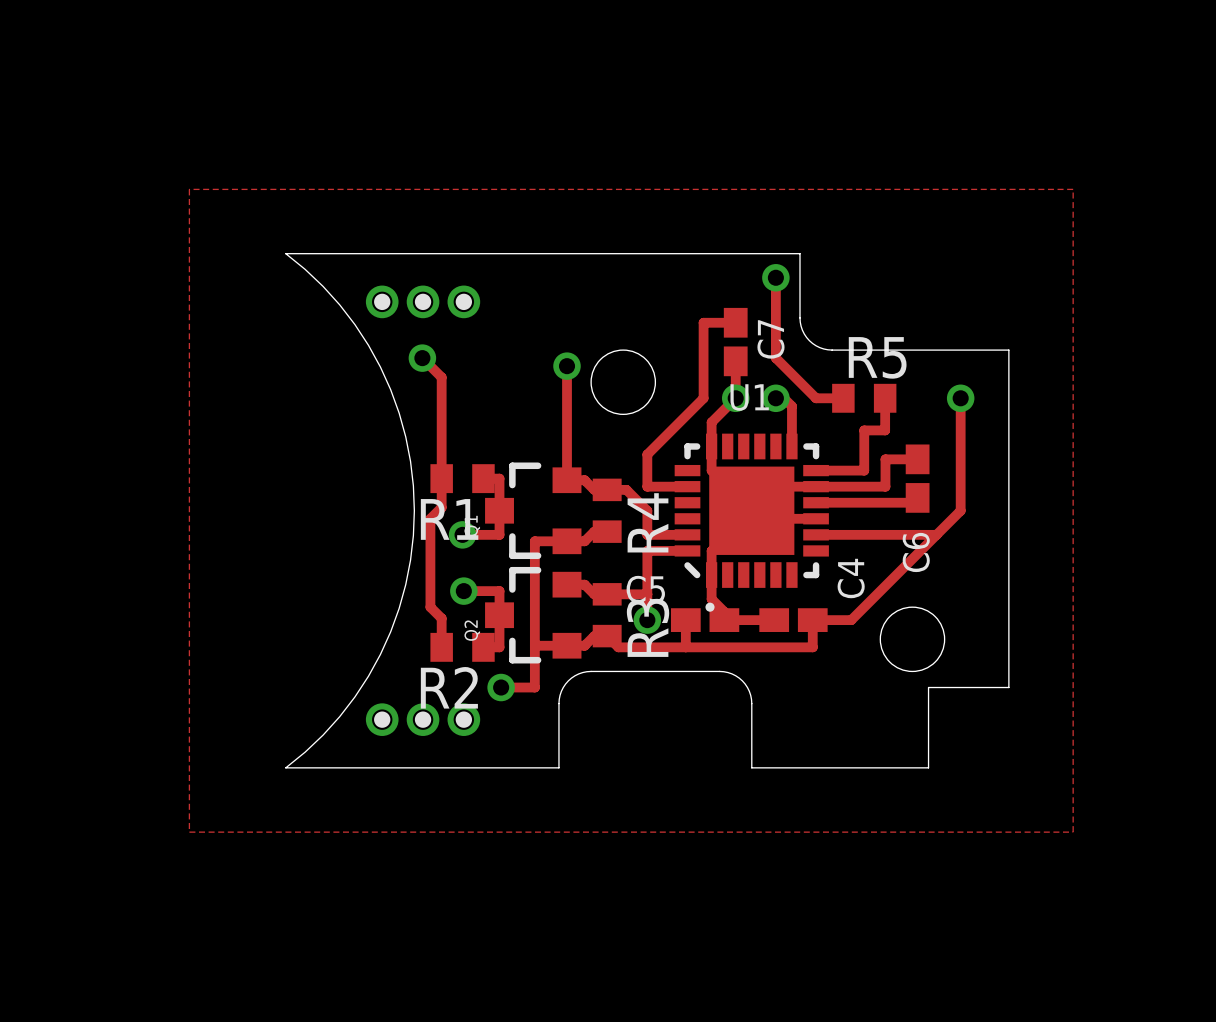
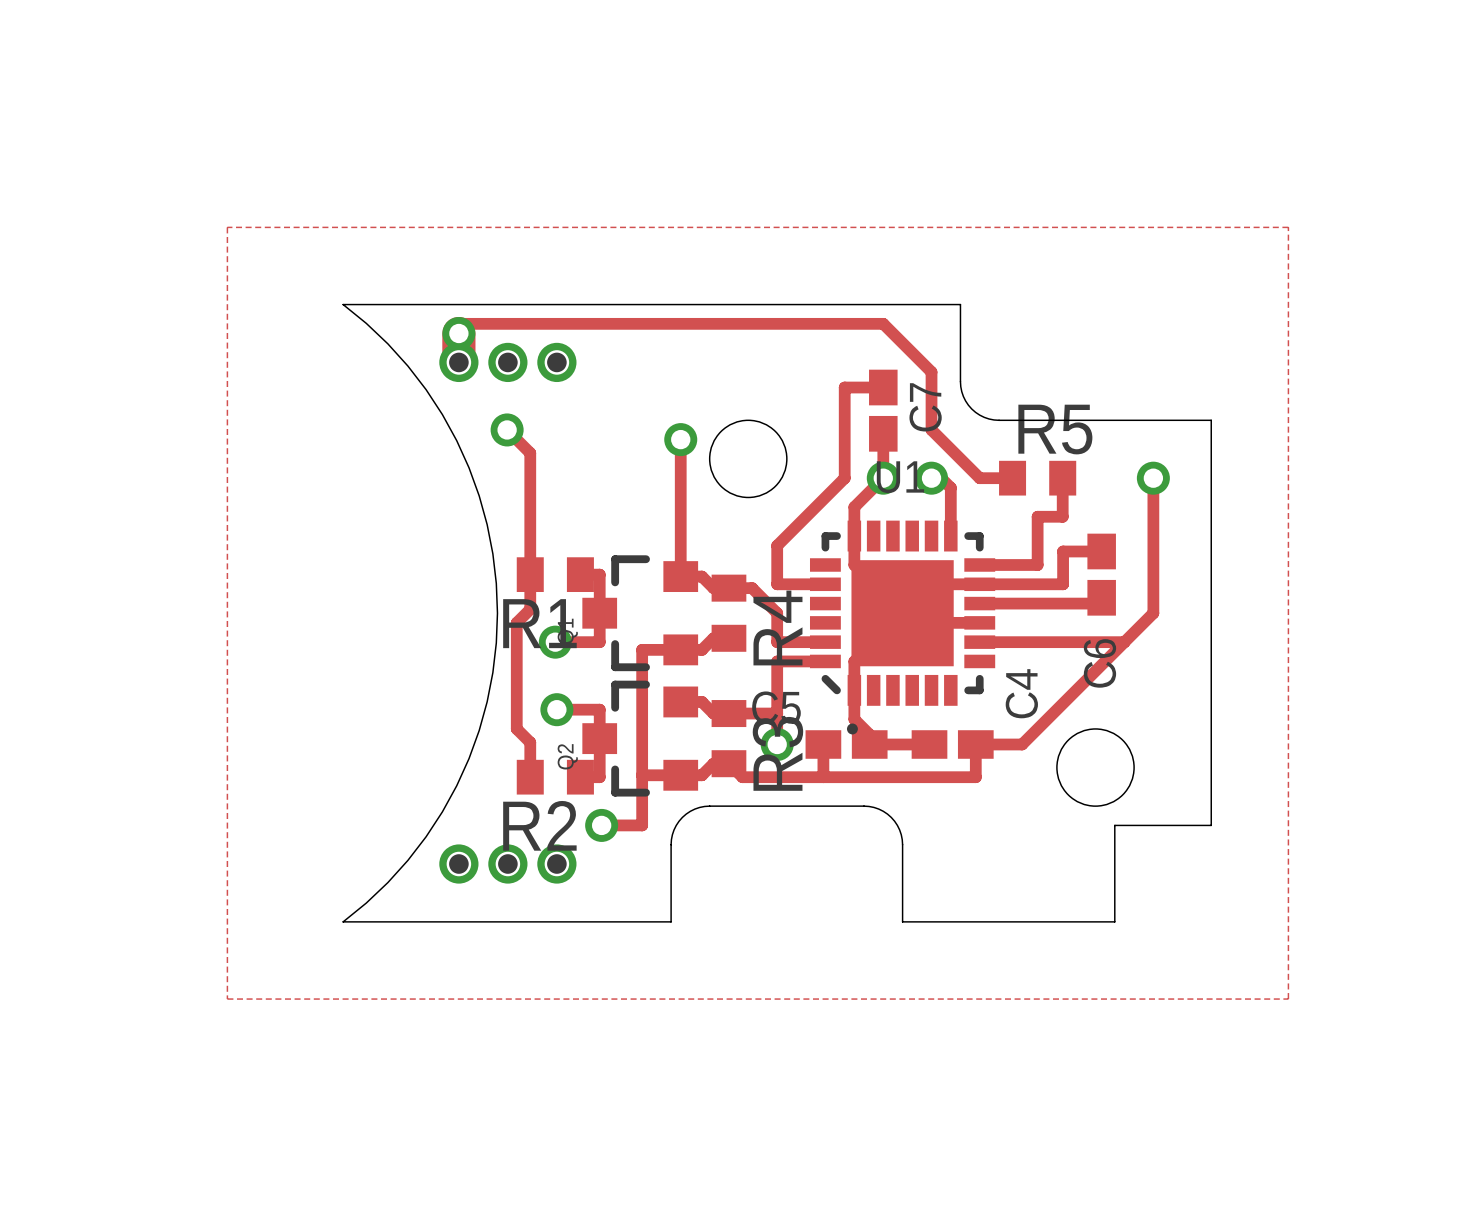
via: none -> (458, 333)
track: (775, 277) (775, 309) -> (458, 362) (458, 323) (883, 323) (931, 372)
via: (775, 277) -> none

